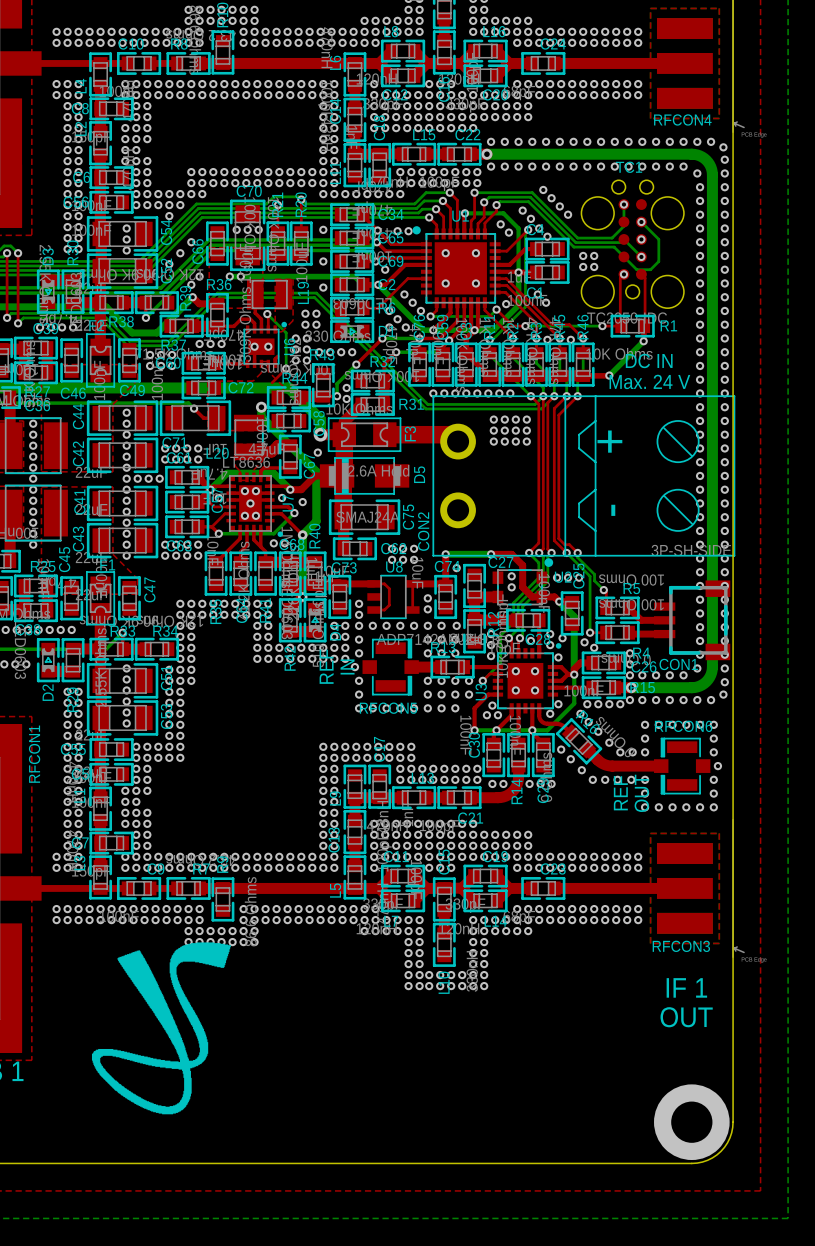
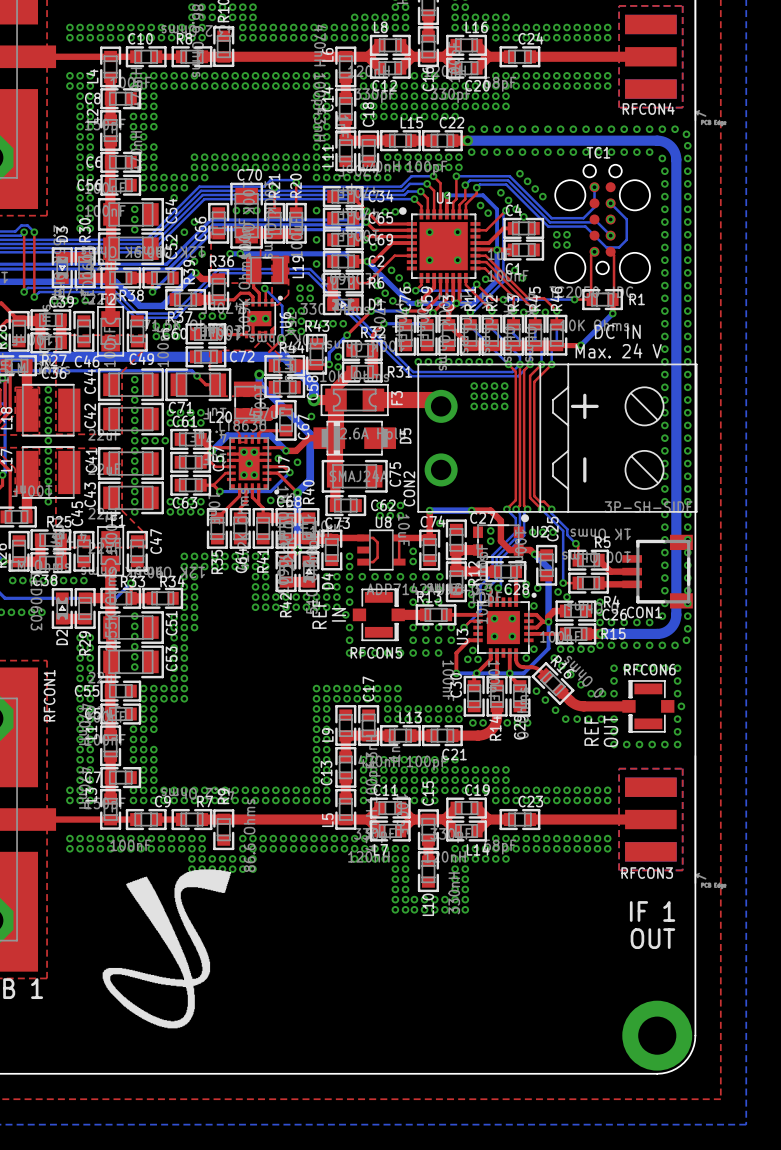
R5 value: 100 Ohms (631, 580) -> 1K Ohms (600, 534)

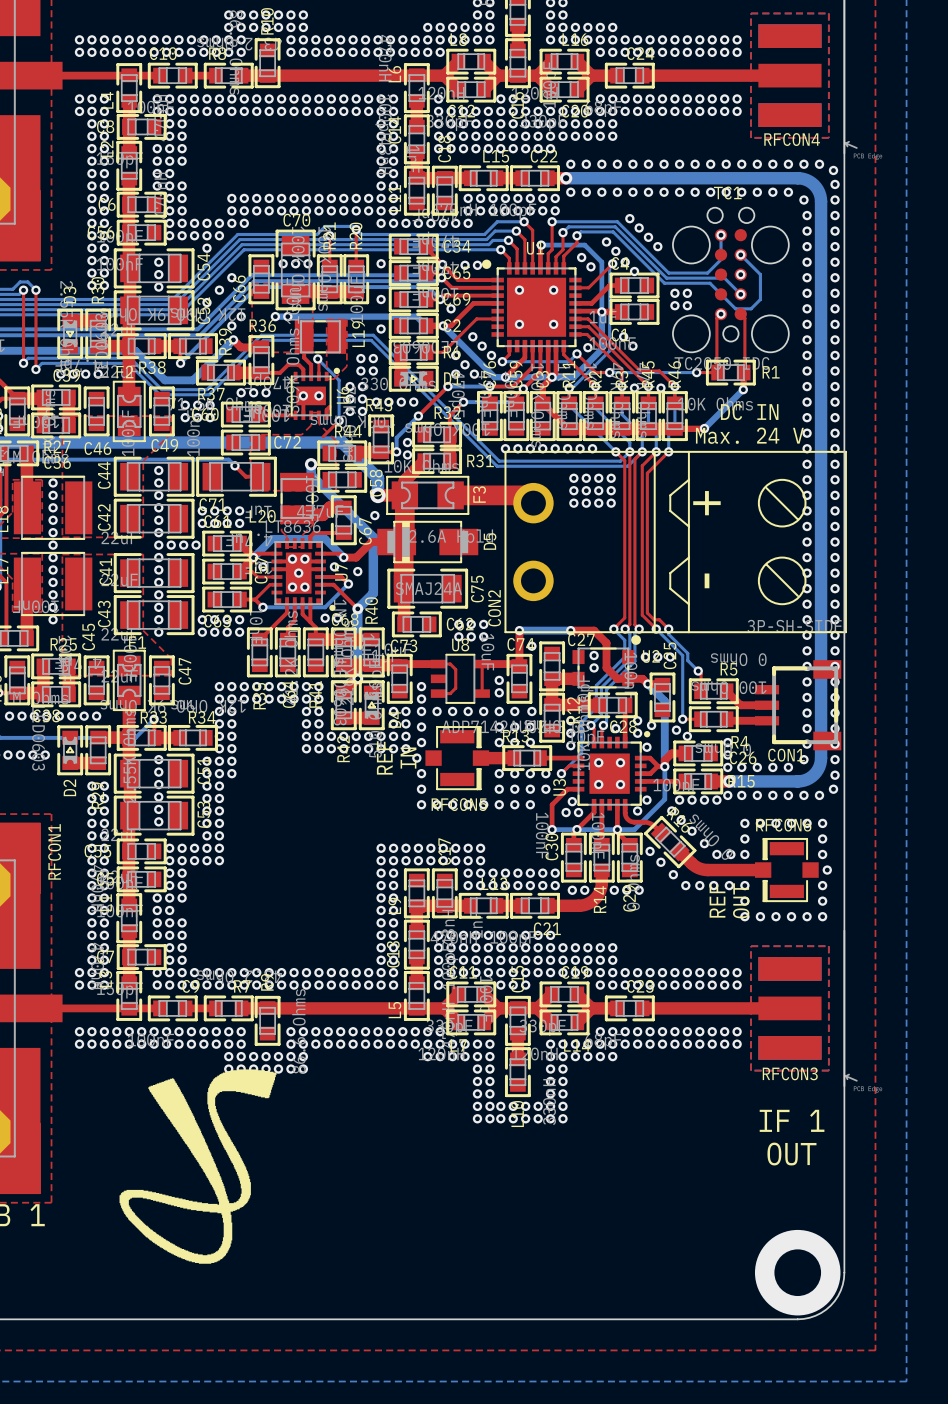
R5 value: 1K Ohms (600, 534) -> 0 Ohms (738, 659)

